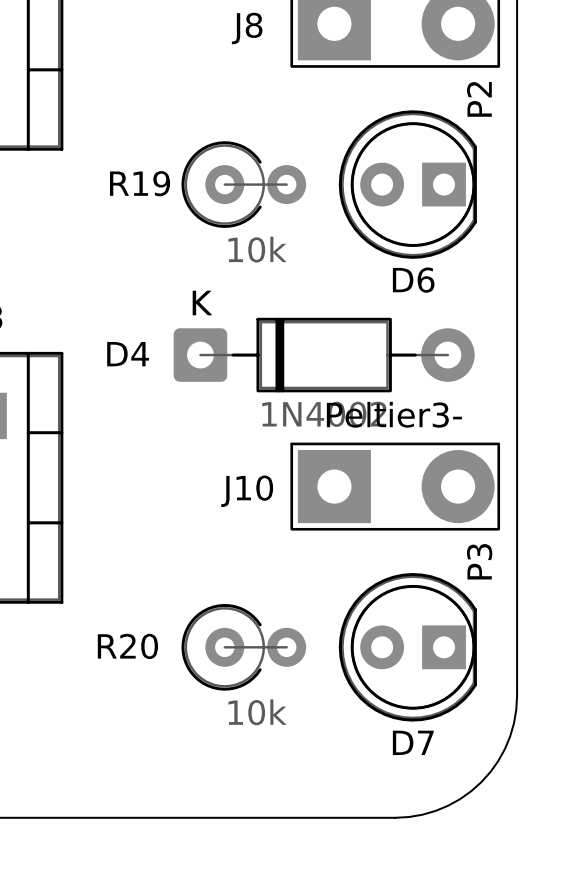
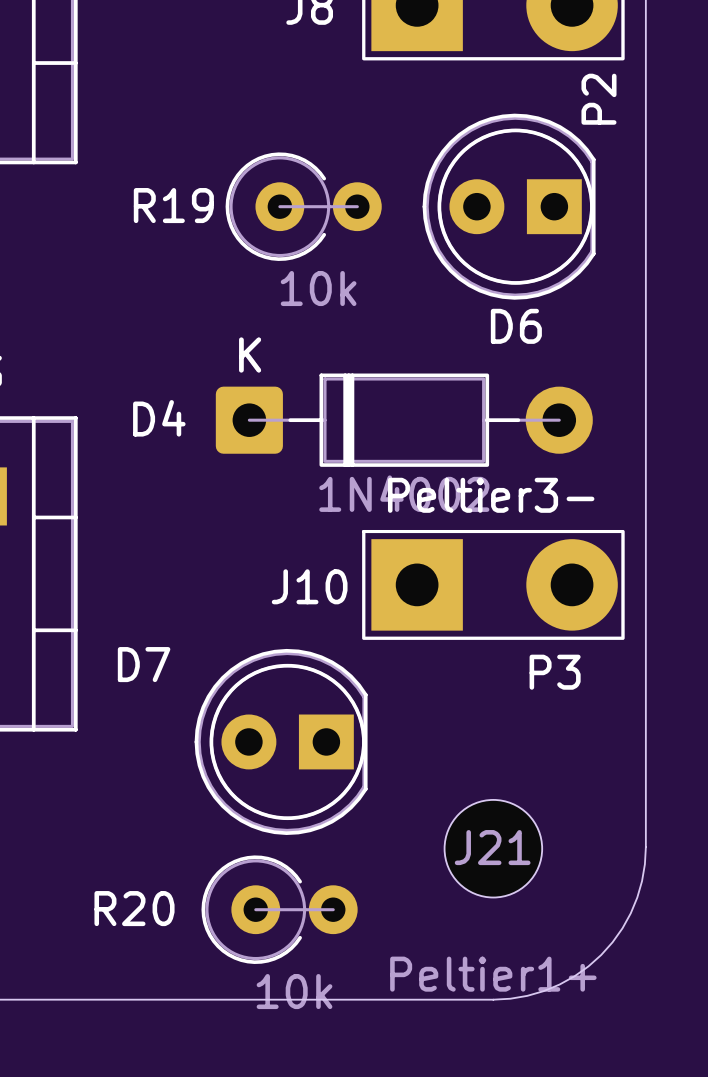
D7 value rotation: 0° (479, 561) -> 90° clockwise (555, 672)
R20 position: (243, 647) -> (279, 909)
D7 position: (407, 647) -> (281, 741)
J21: none -> Peltier1+ (493, 848)
D7 name position: D7 (413, 742) -> D7 (144, 664)

